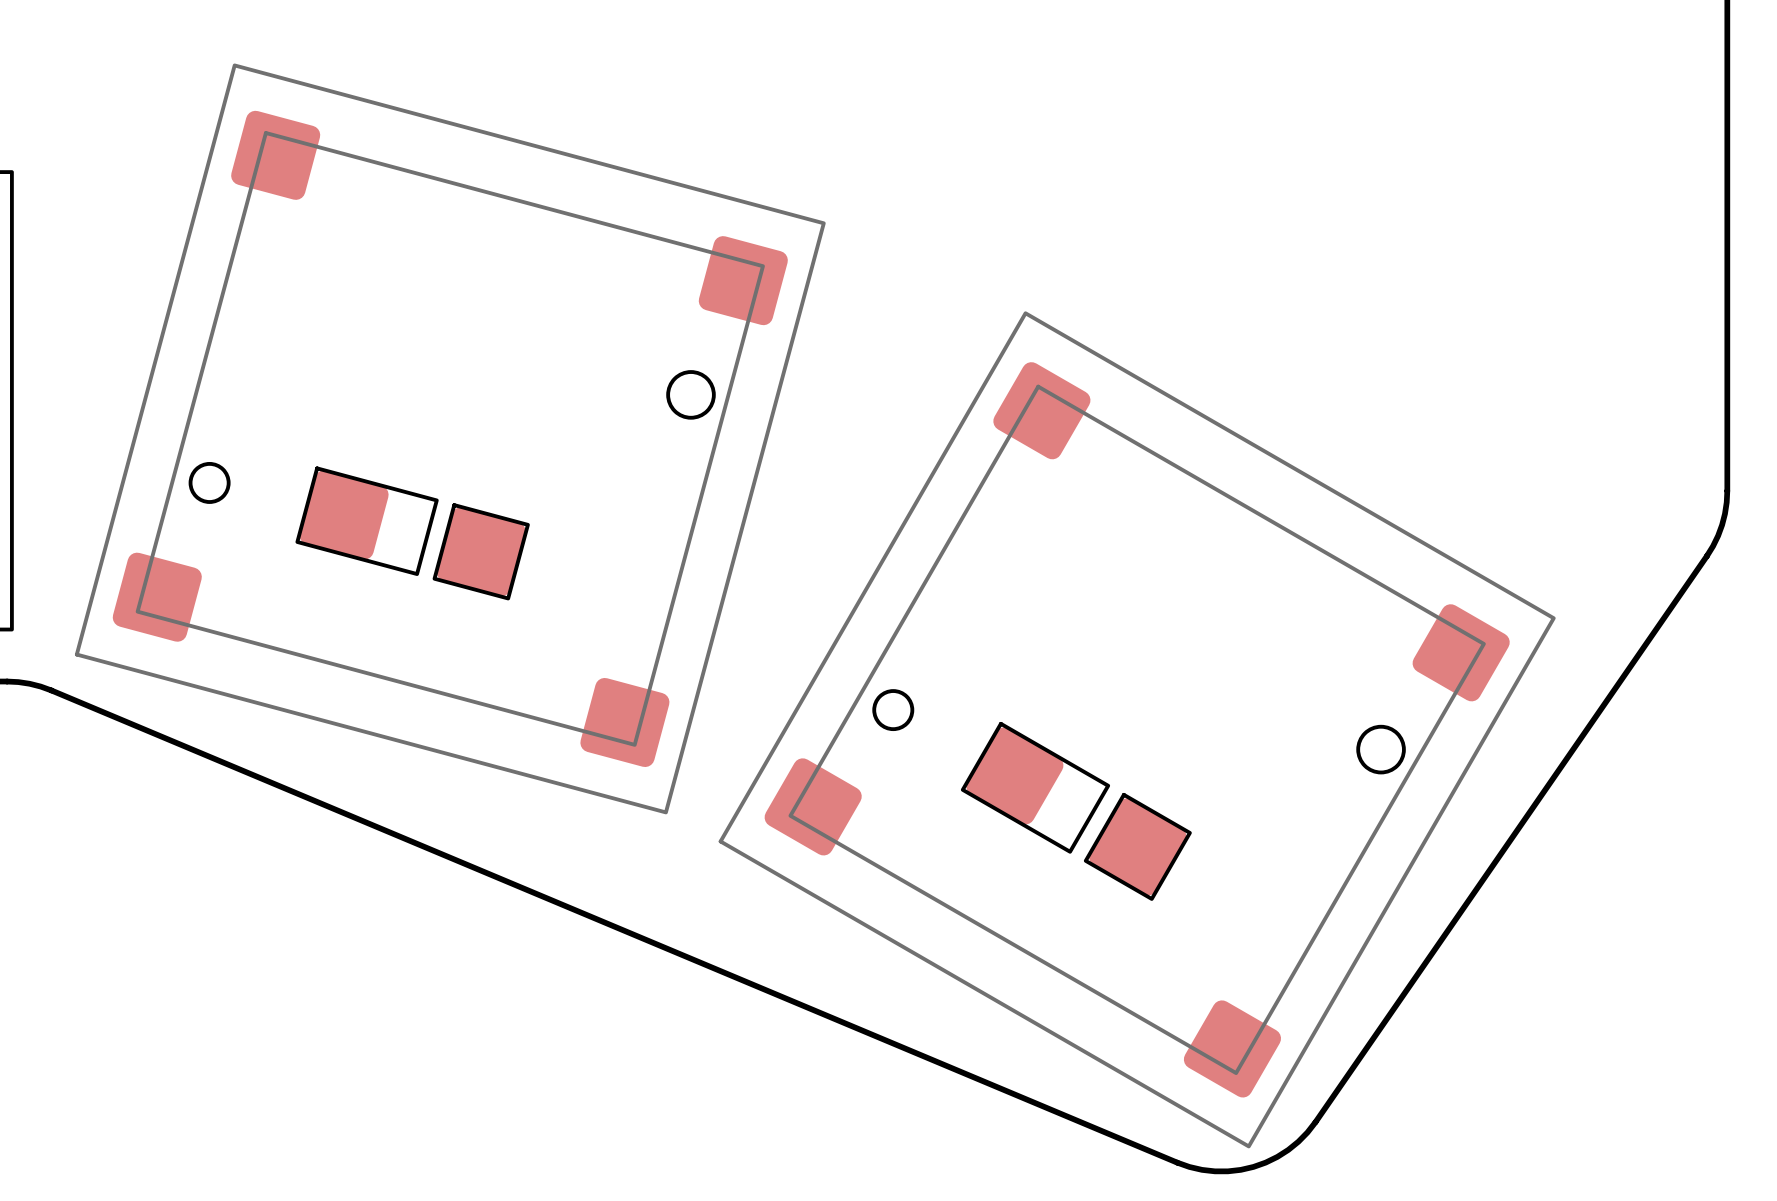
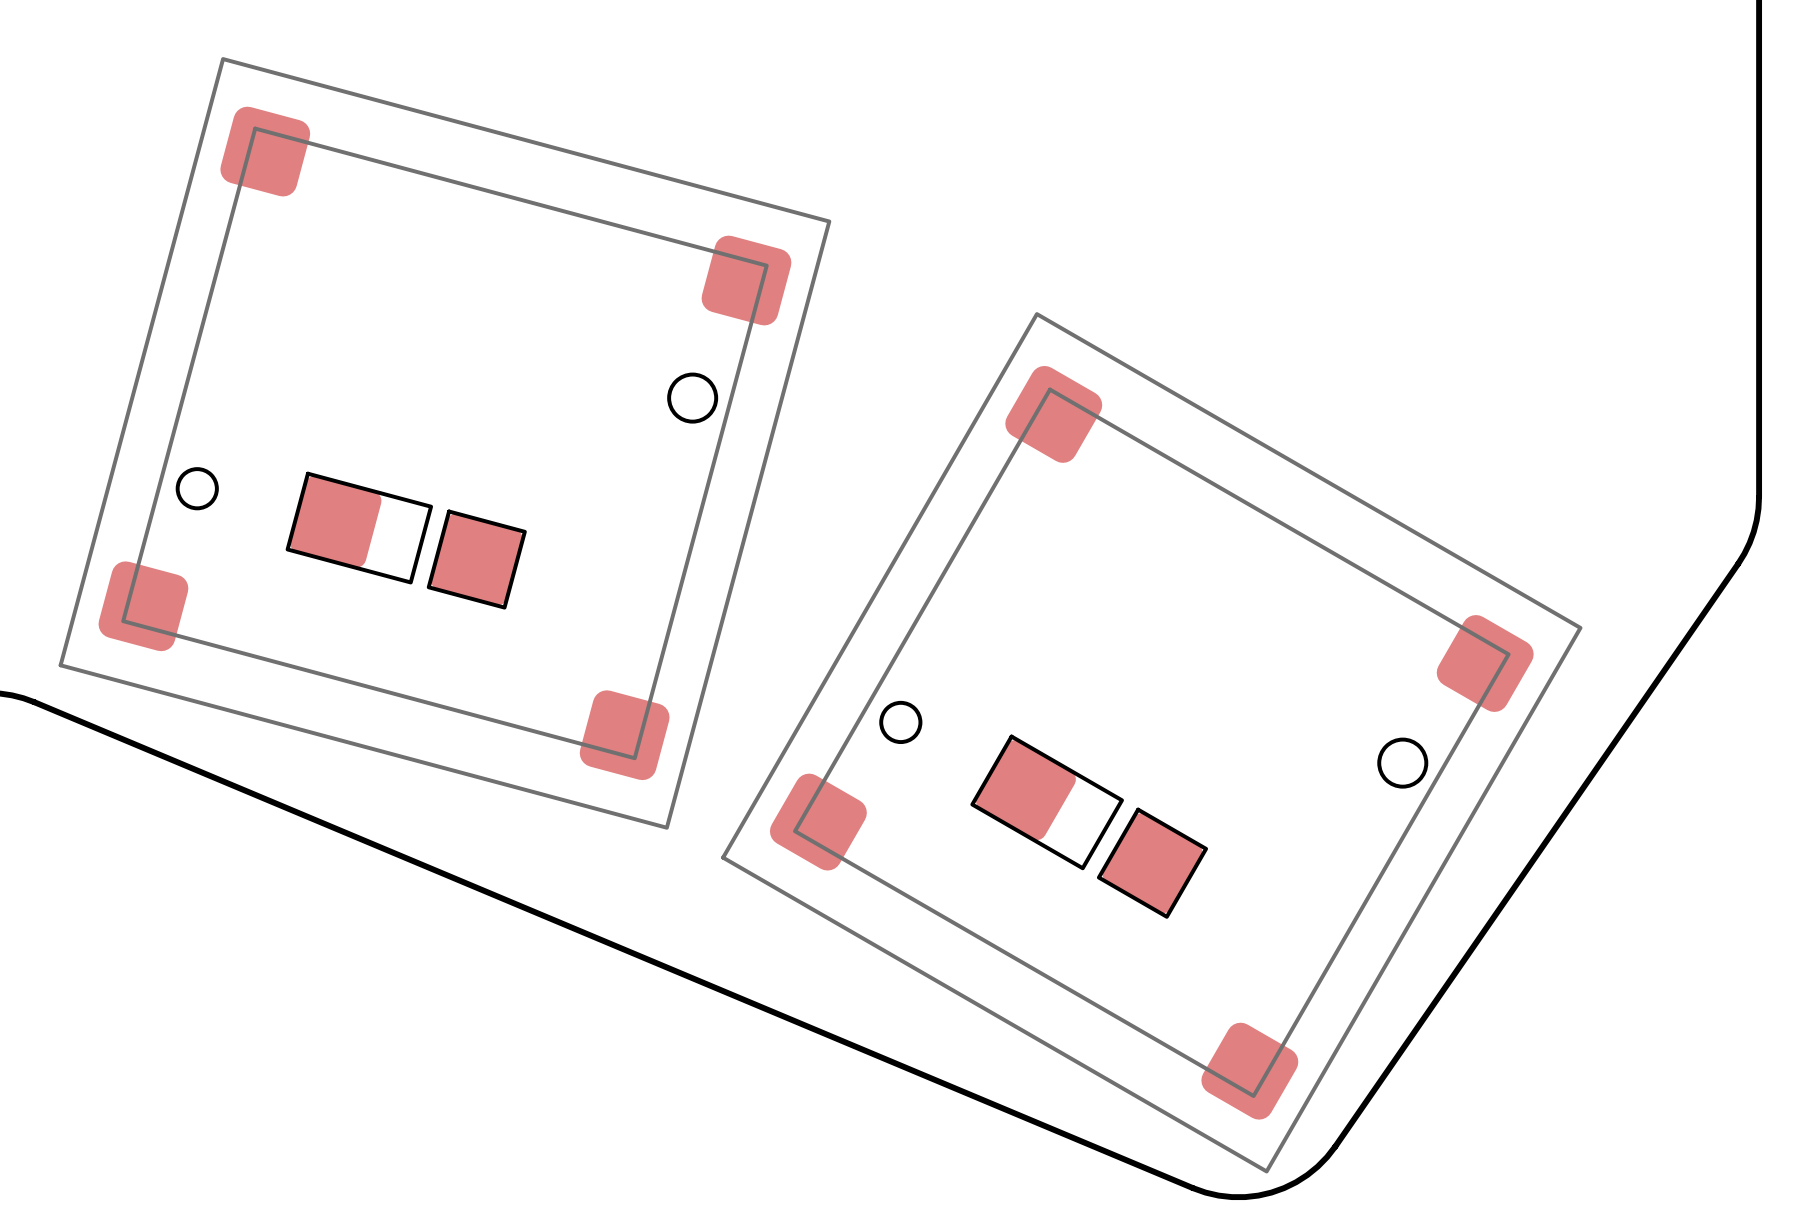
part footprint: [74, 63, 826, 815] -> [58, 57, 832, 830]
part footprint: [718, 311, 1556, 1149] -> [721, 312, 1583, 1174]

